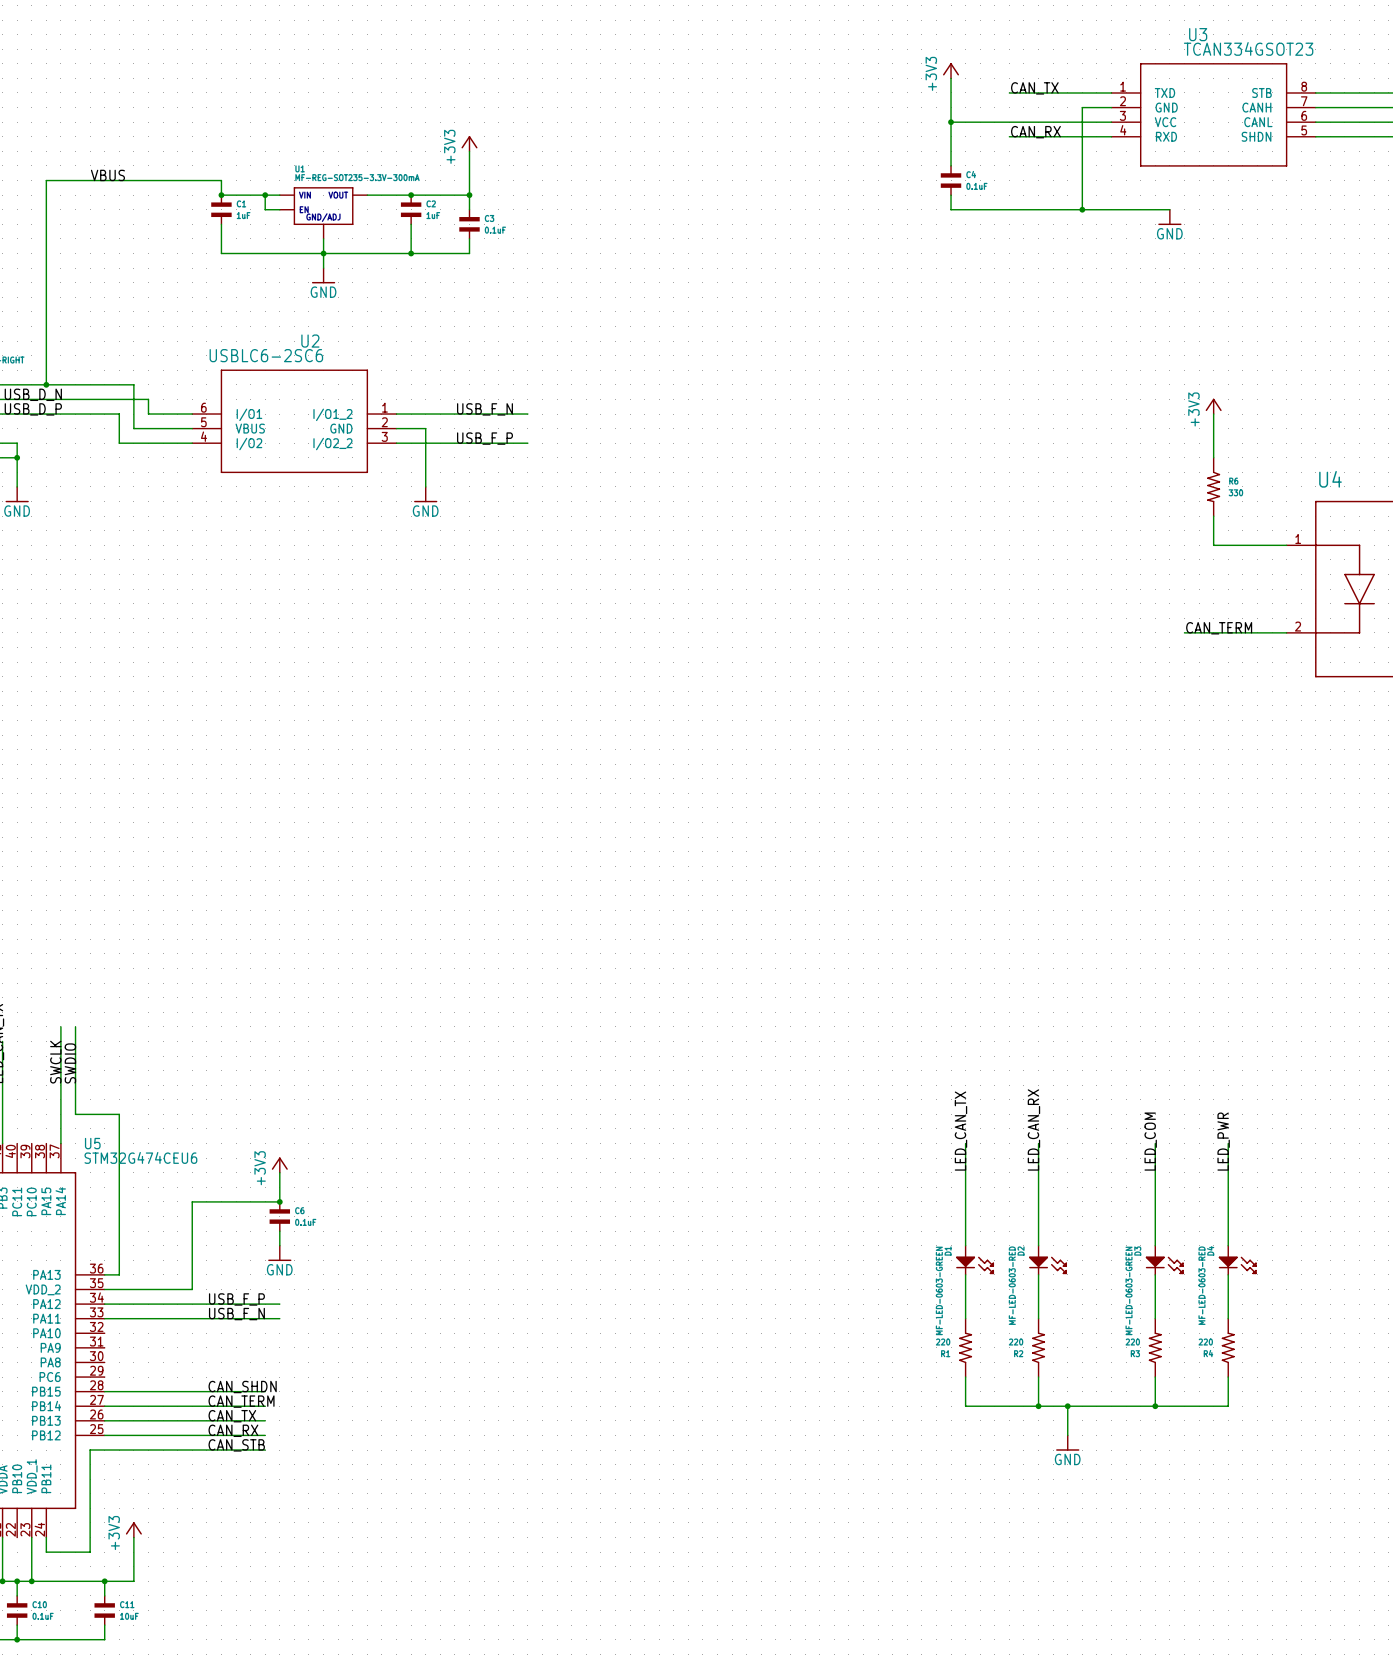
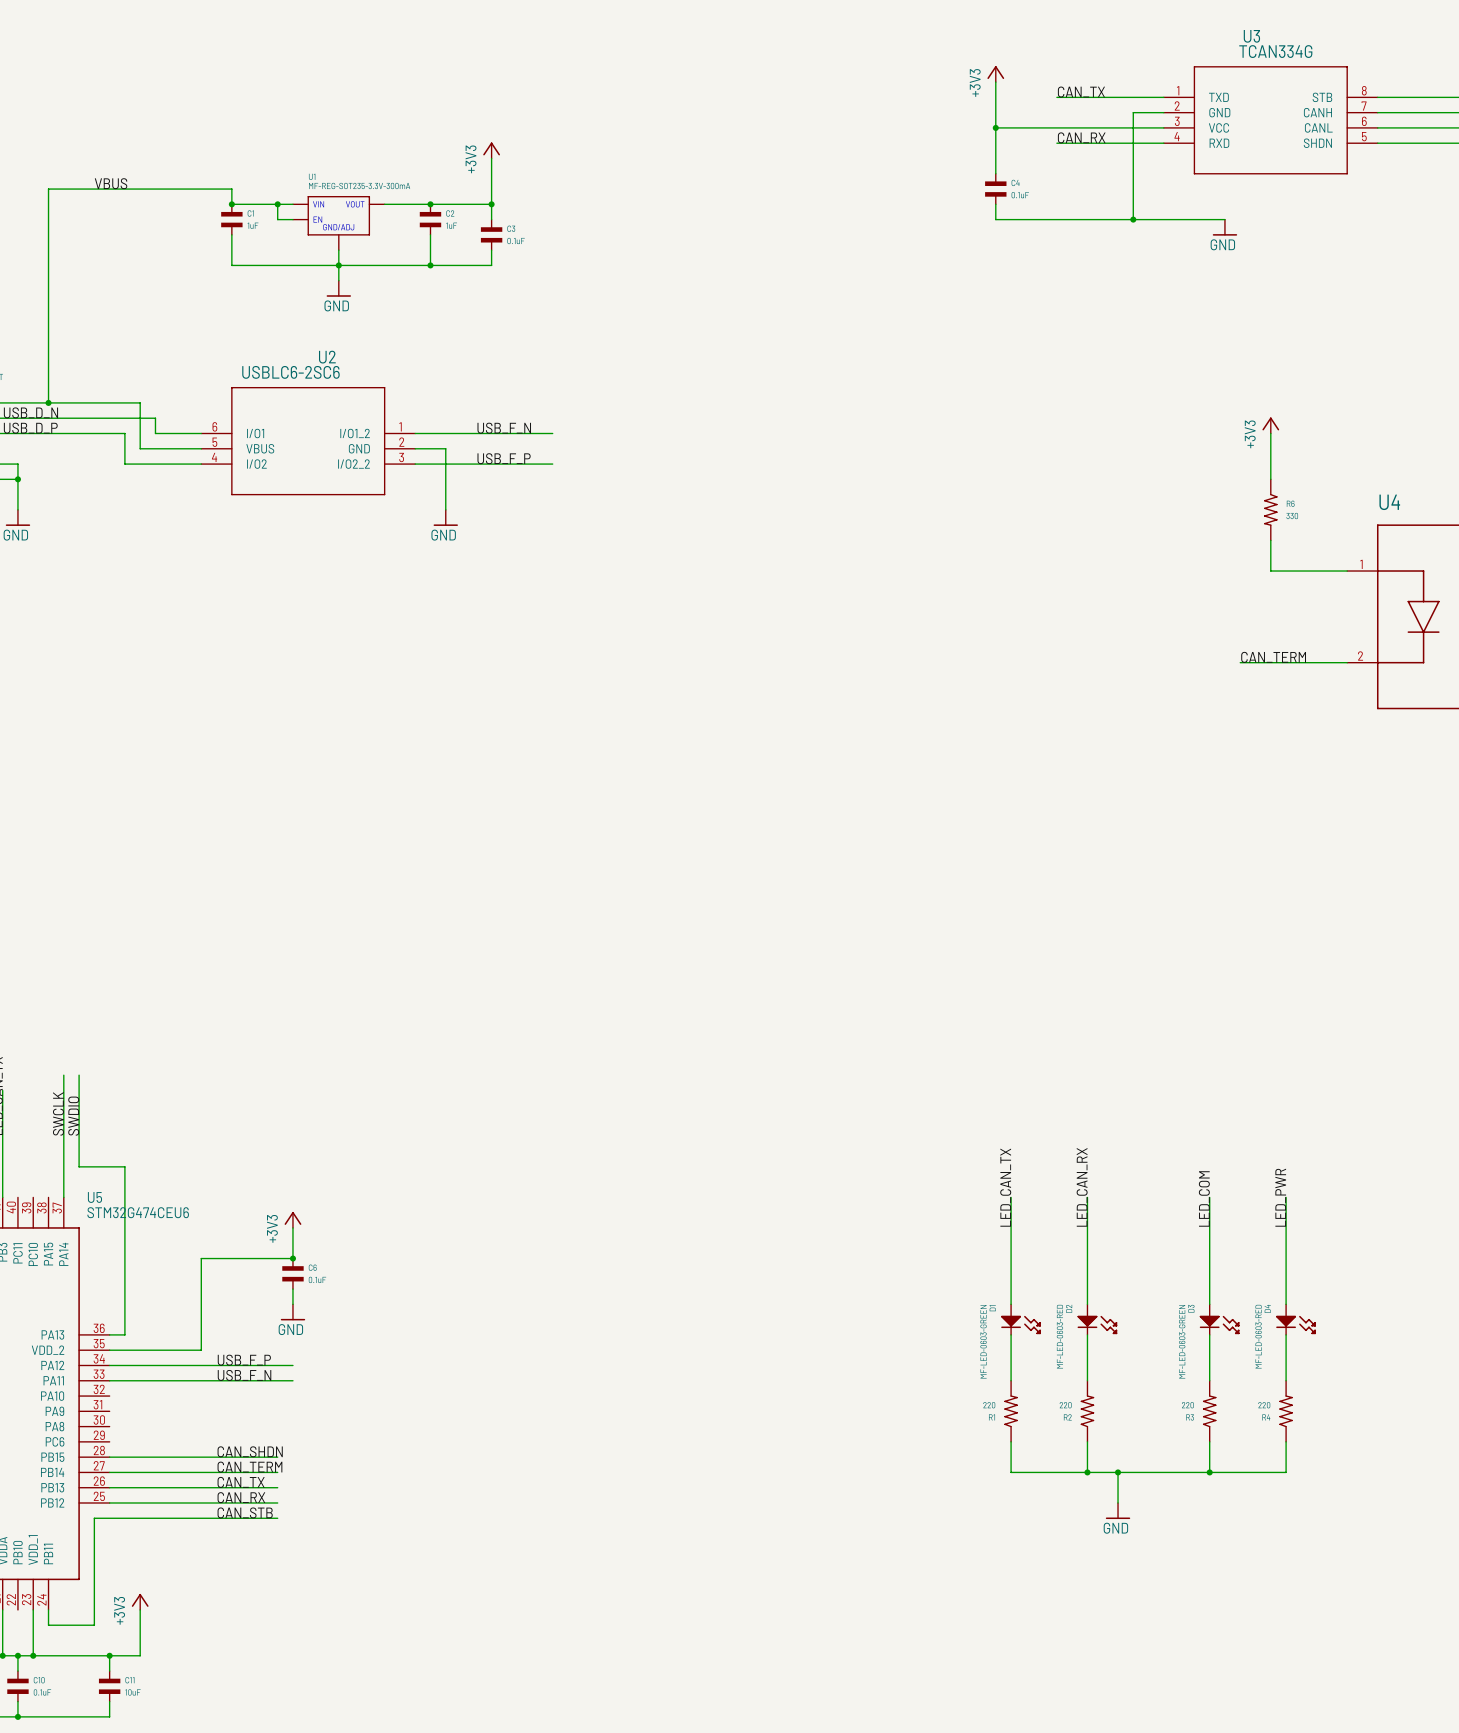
U3 value: TCAN334GSOT23 (1248, 48) -> TCAN334G (1275, 51)

